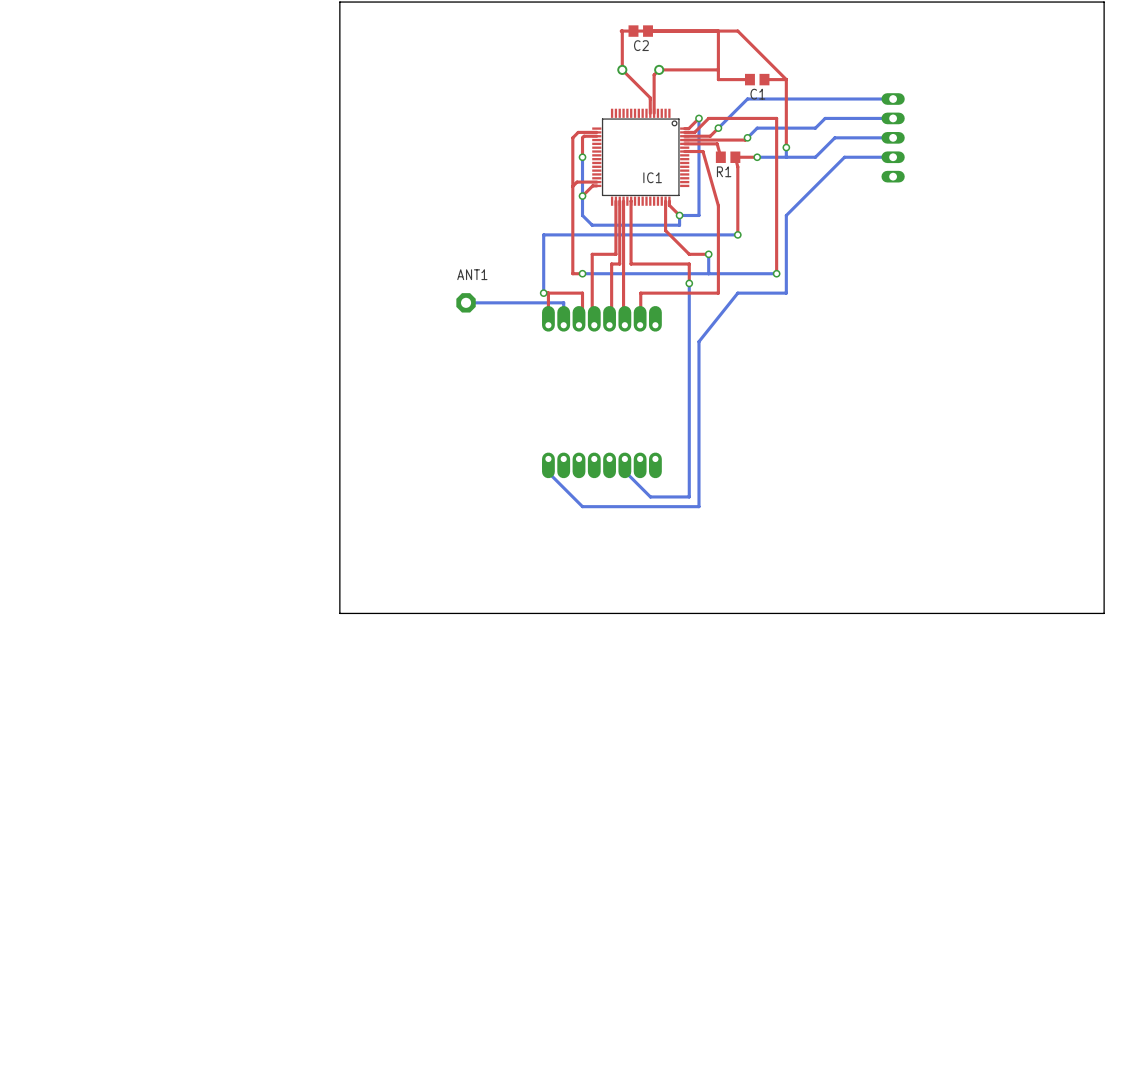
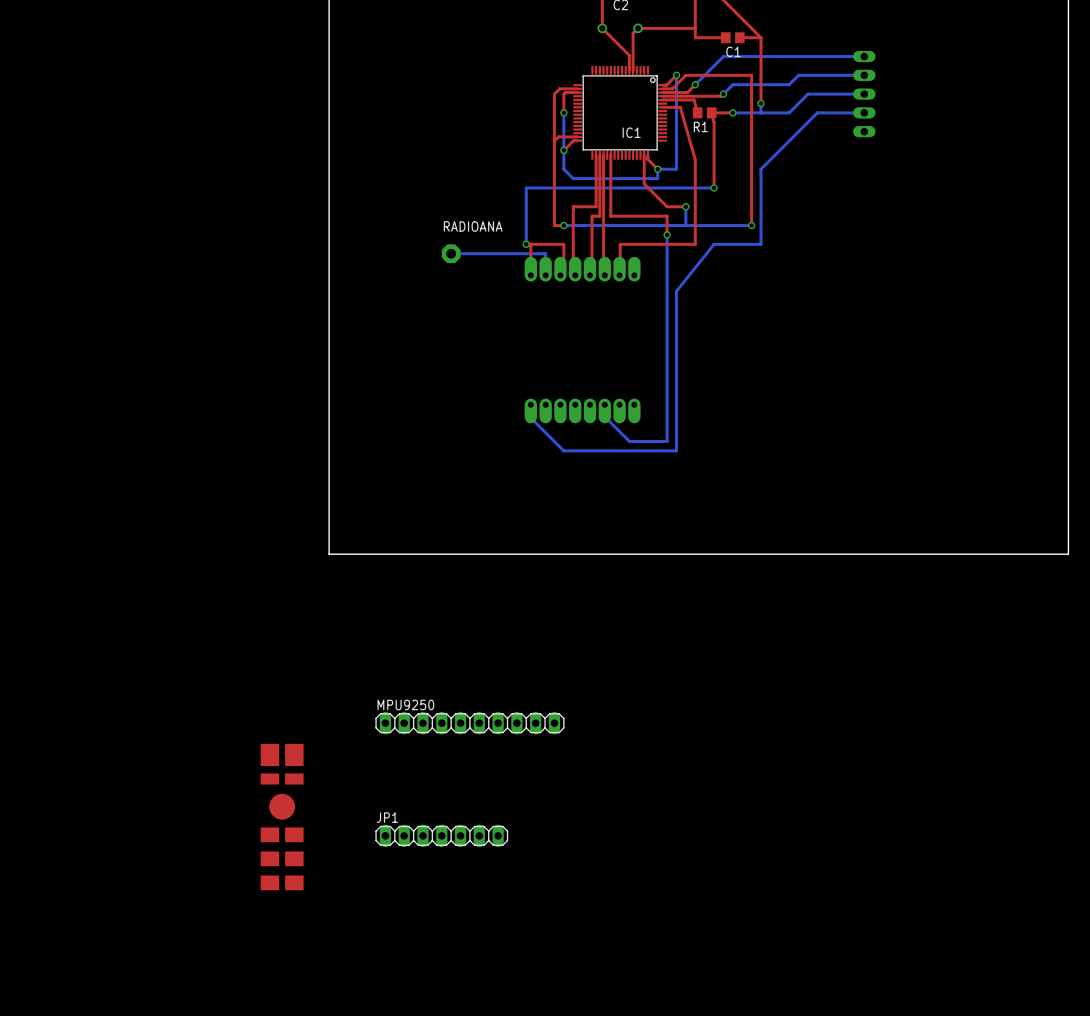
ANT1 name: ANT1 (472, 274) -> RADIOANA (473, 226)
MPU9250: none -> (469, 723)
part: none -> (282, 817)
JP1: none -> (441, 835)

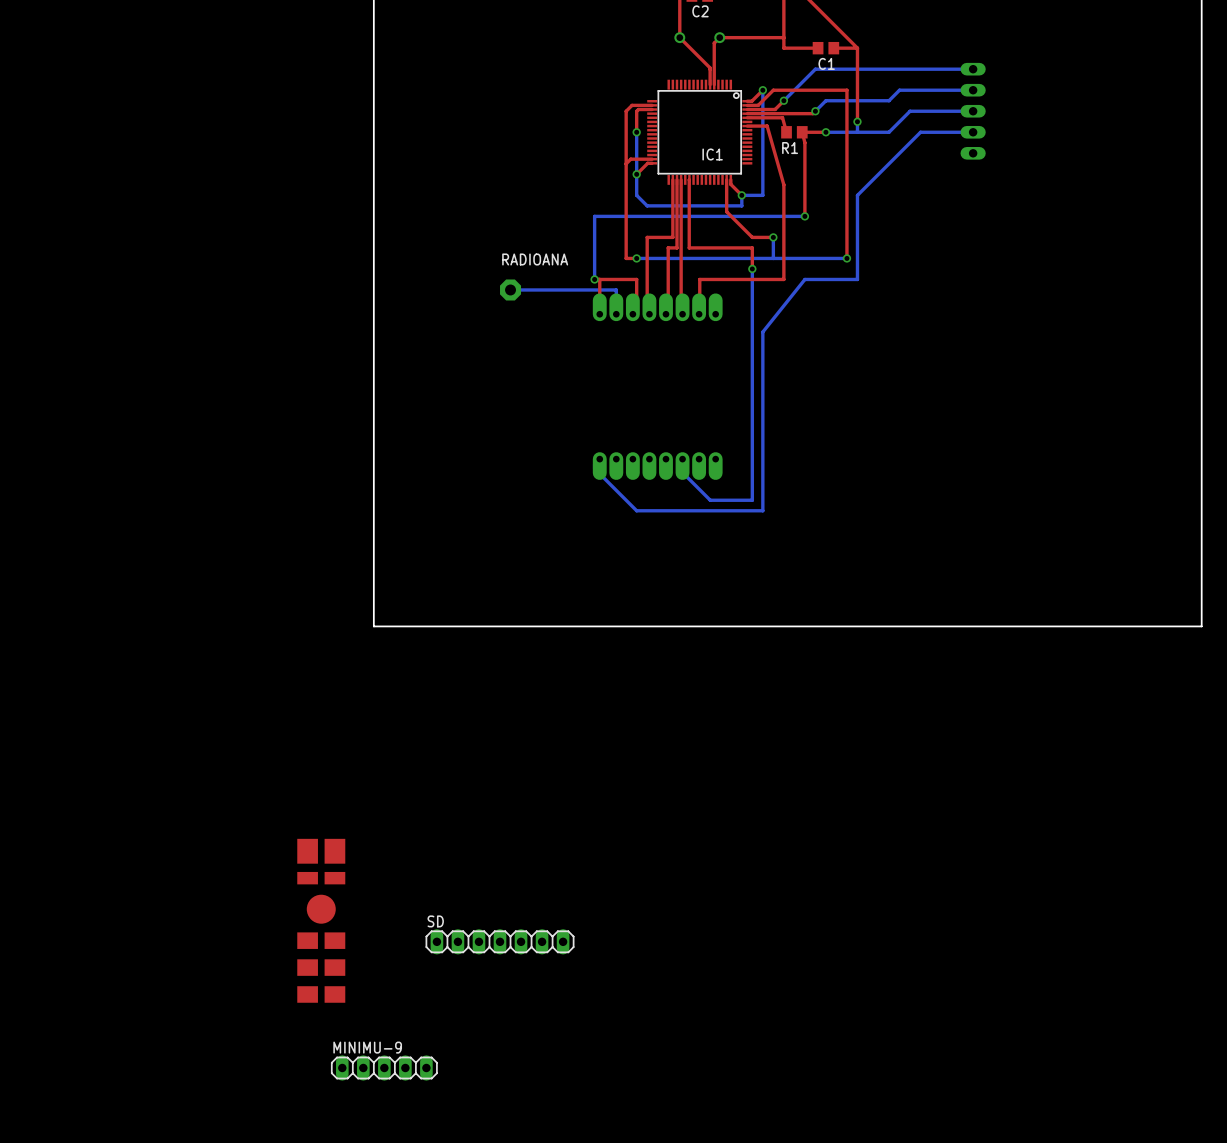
MPU9250: (469, 723) -> none
JP1 name: JP1 (387, 817) -> SD (435, 921)
MINIMU-9: none -> (384, 1067)

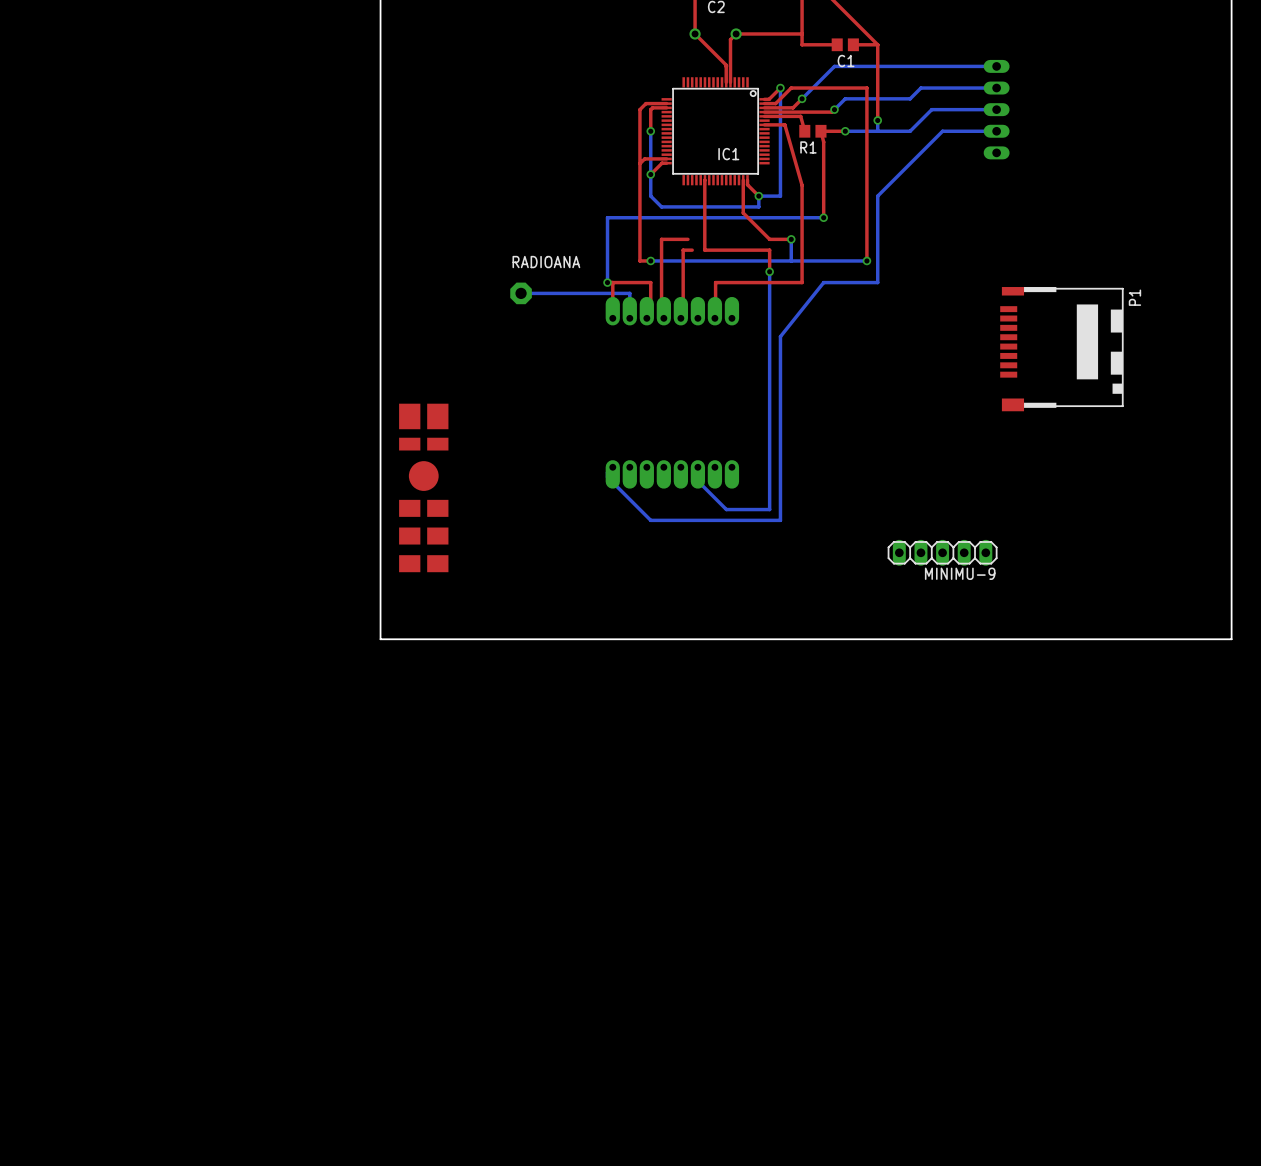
top track: (672, 179) (672, 237) -> none
top track: (677, 179) (677, 247) -> none
top track: (681, 179) (681, 314) -> none
P1: none -> (1061, 349)
part: none -> (423, 487)
part: (321, 920) -> none
SD: (500, 941) -> none
MINIMU-9 name position: MINIMU-9 (367, 1047) -> MINIMU-9 (960, 573)
MINIMU-9 position: (384, 1067) -> (942, 552)

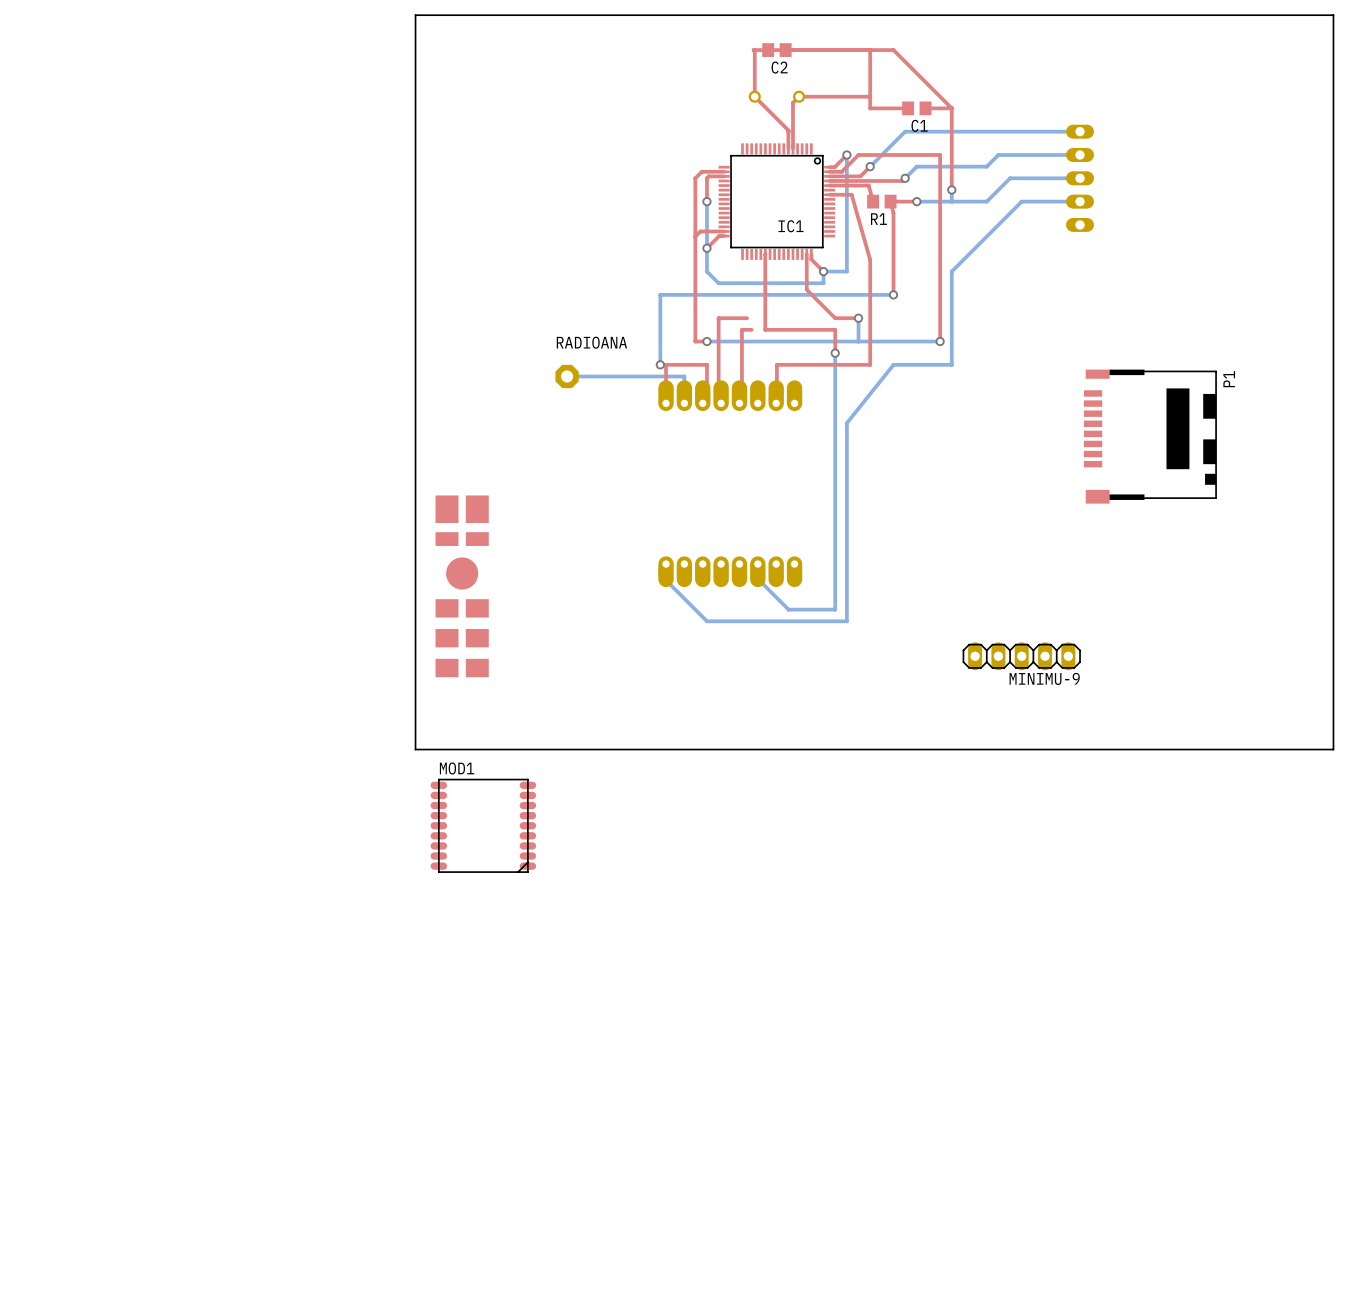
MOD1: none -> (483, 825)

